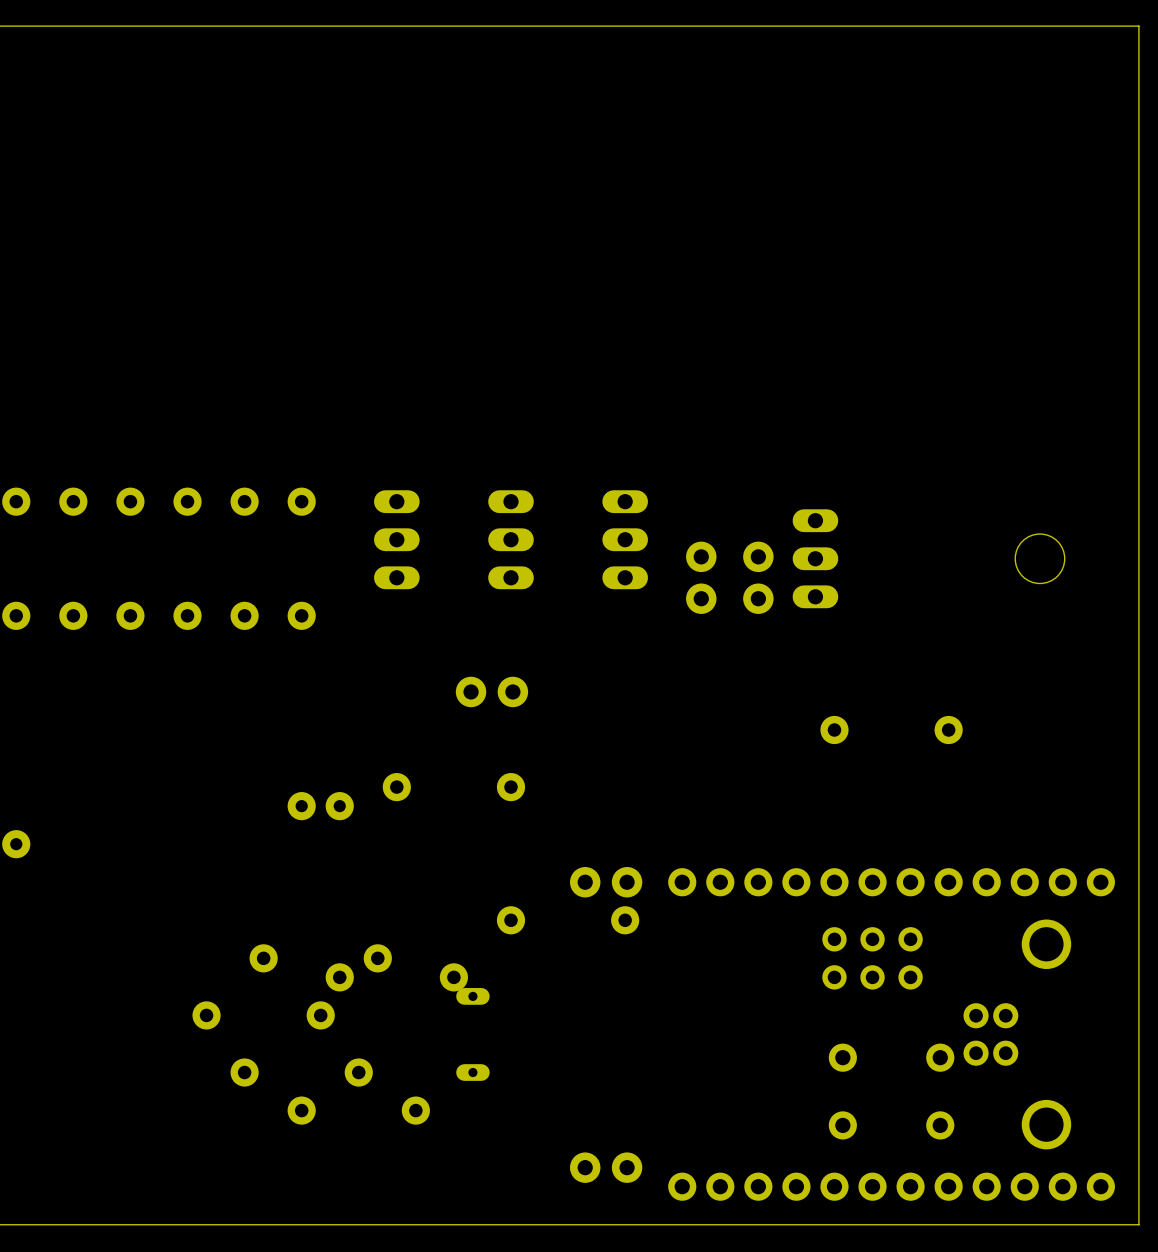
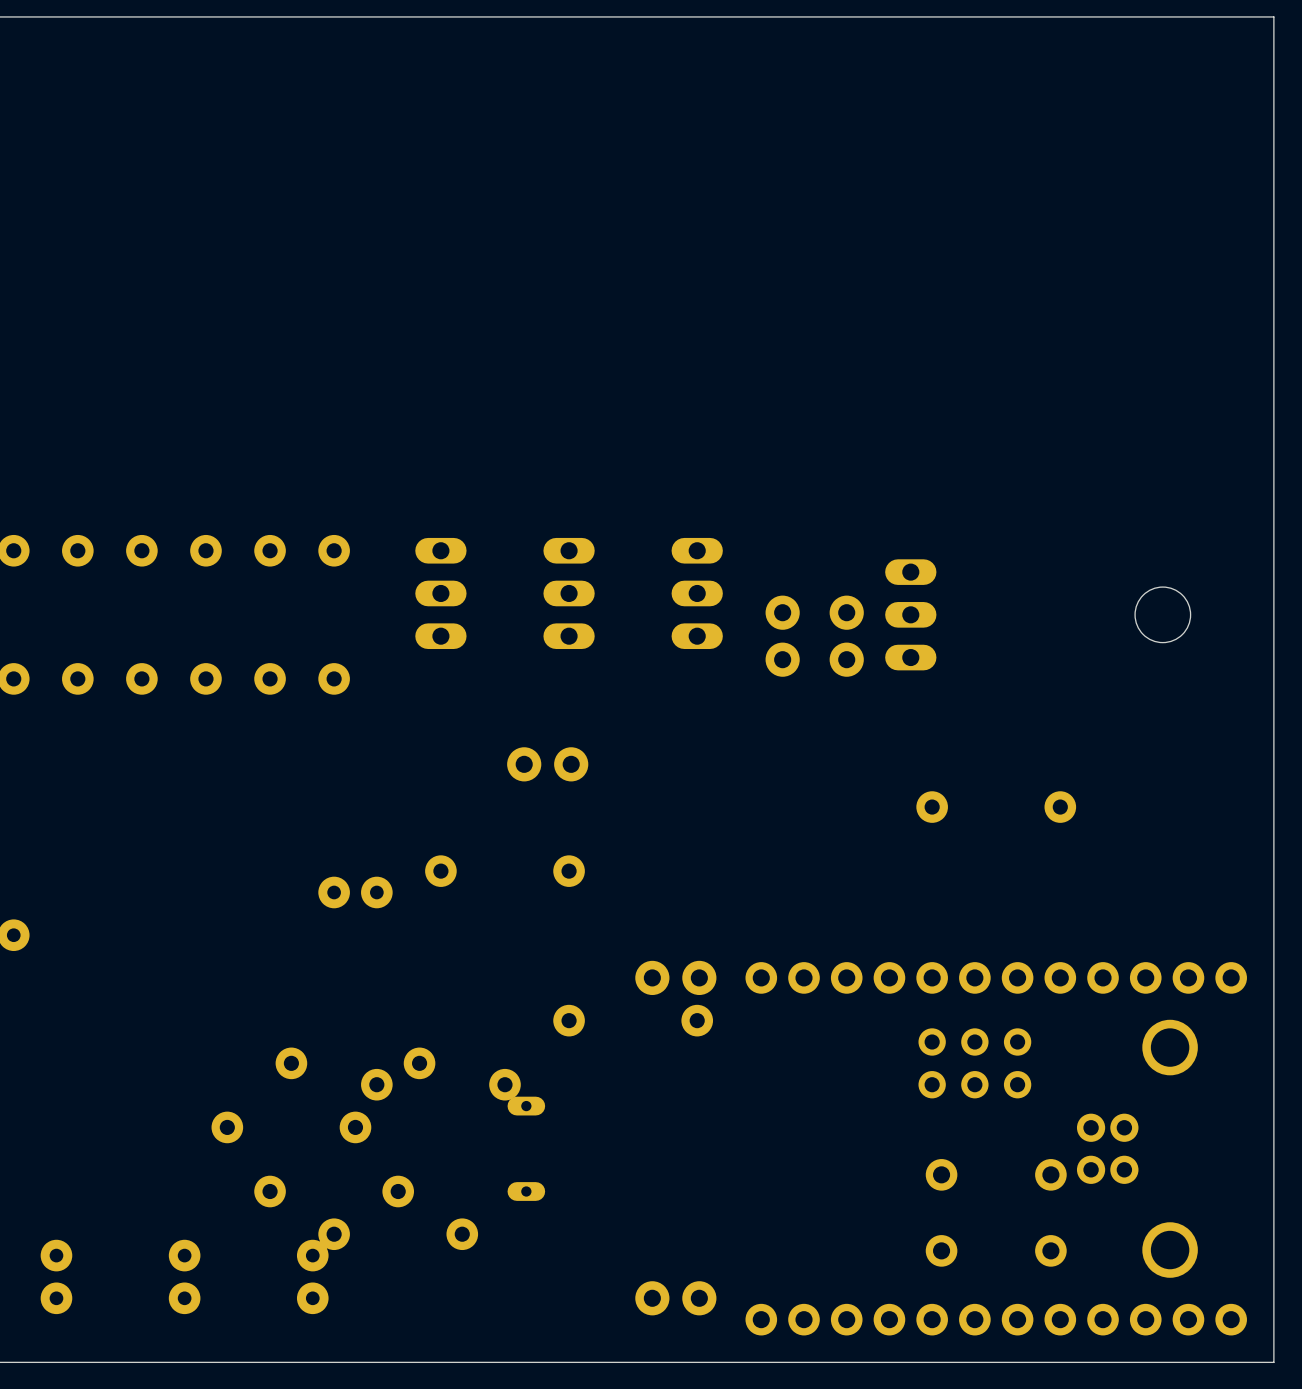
part: none -> (56, 1276)
part: none -> (184, 1276)
part: none -> (312, 1276)

